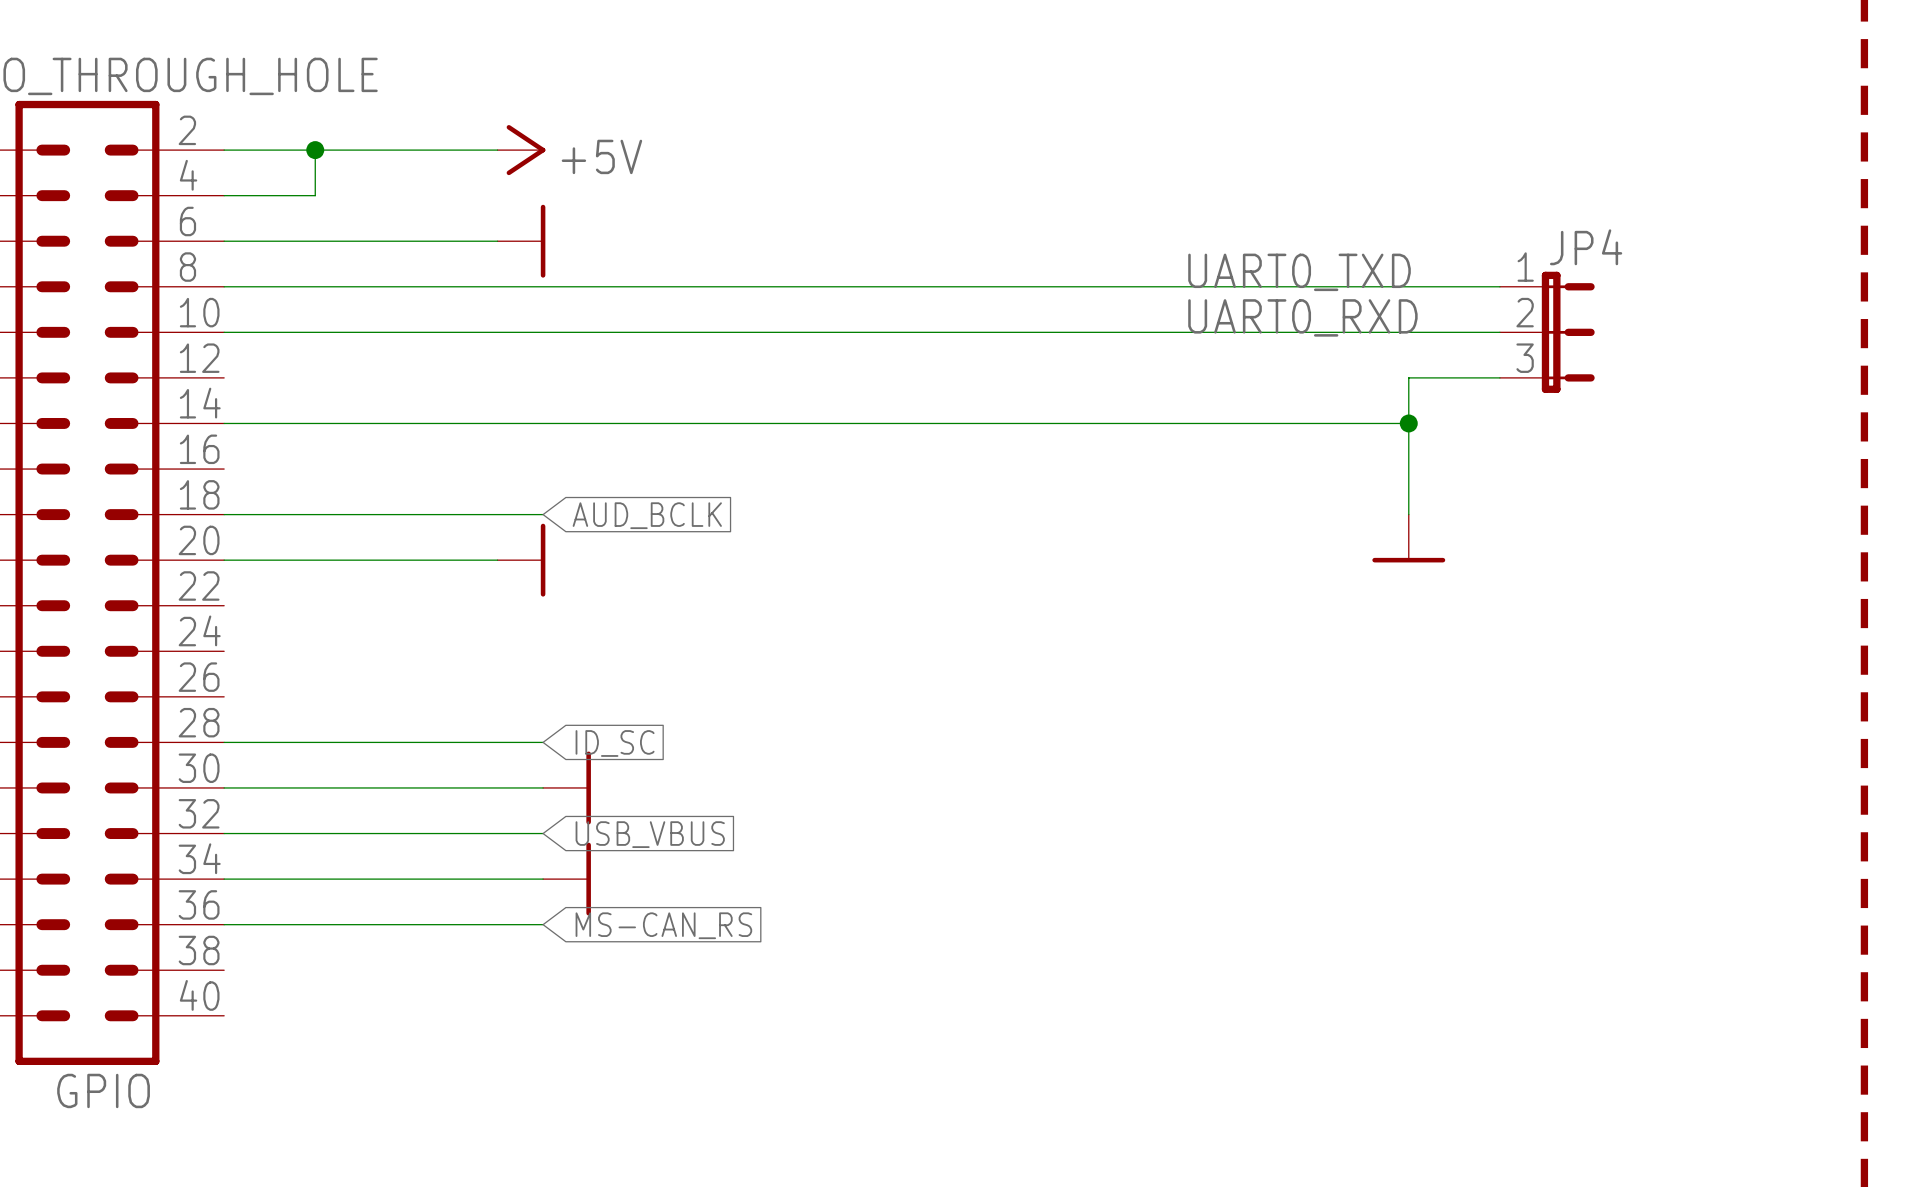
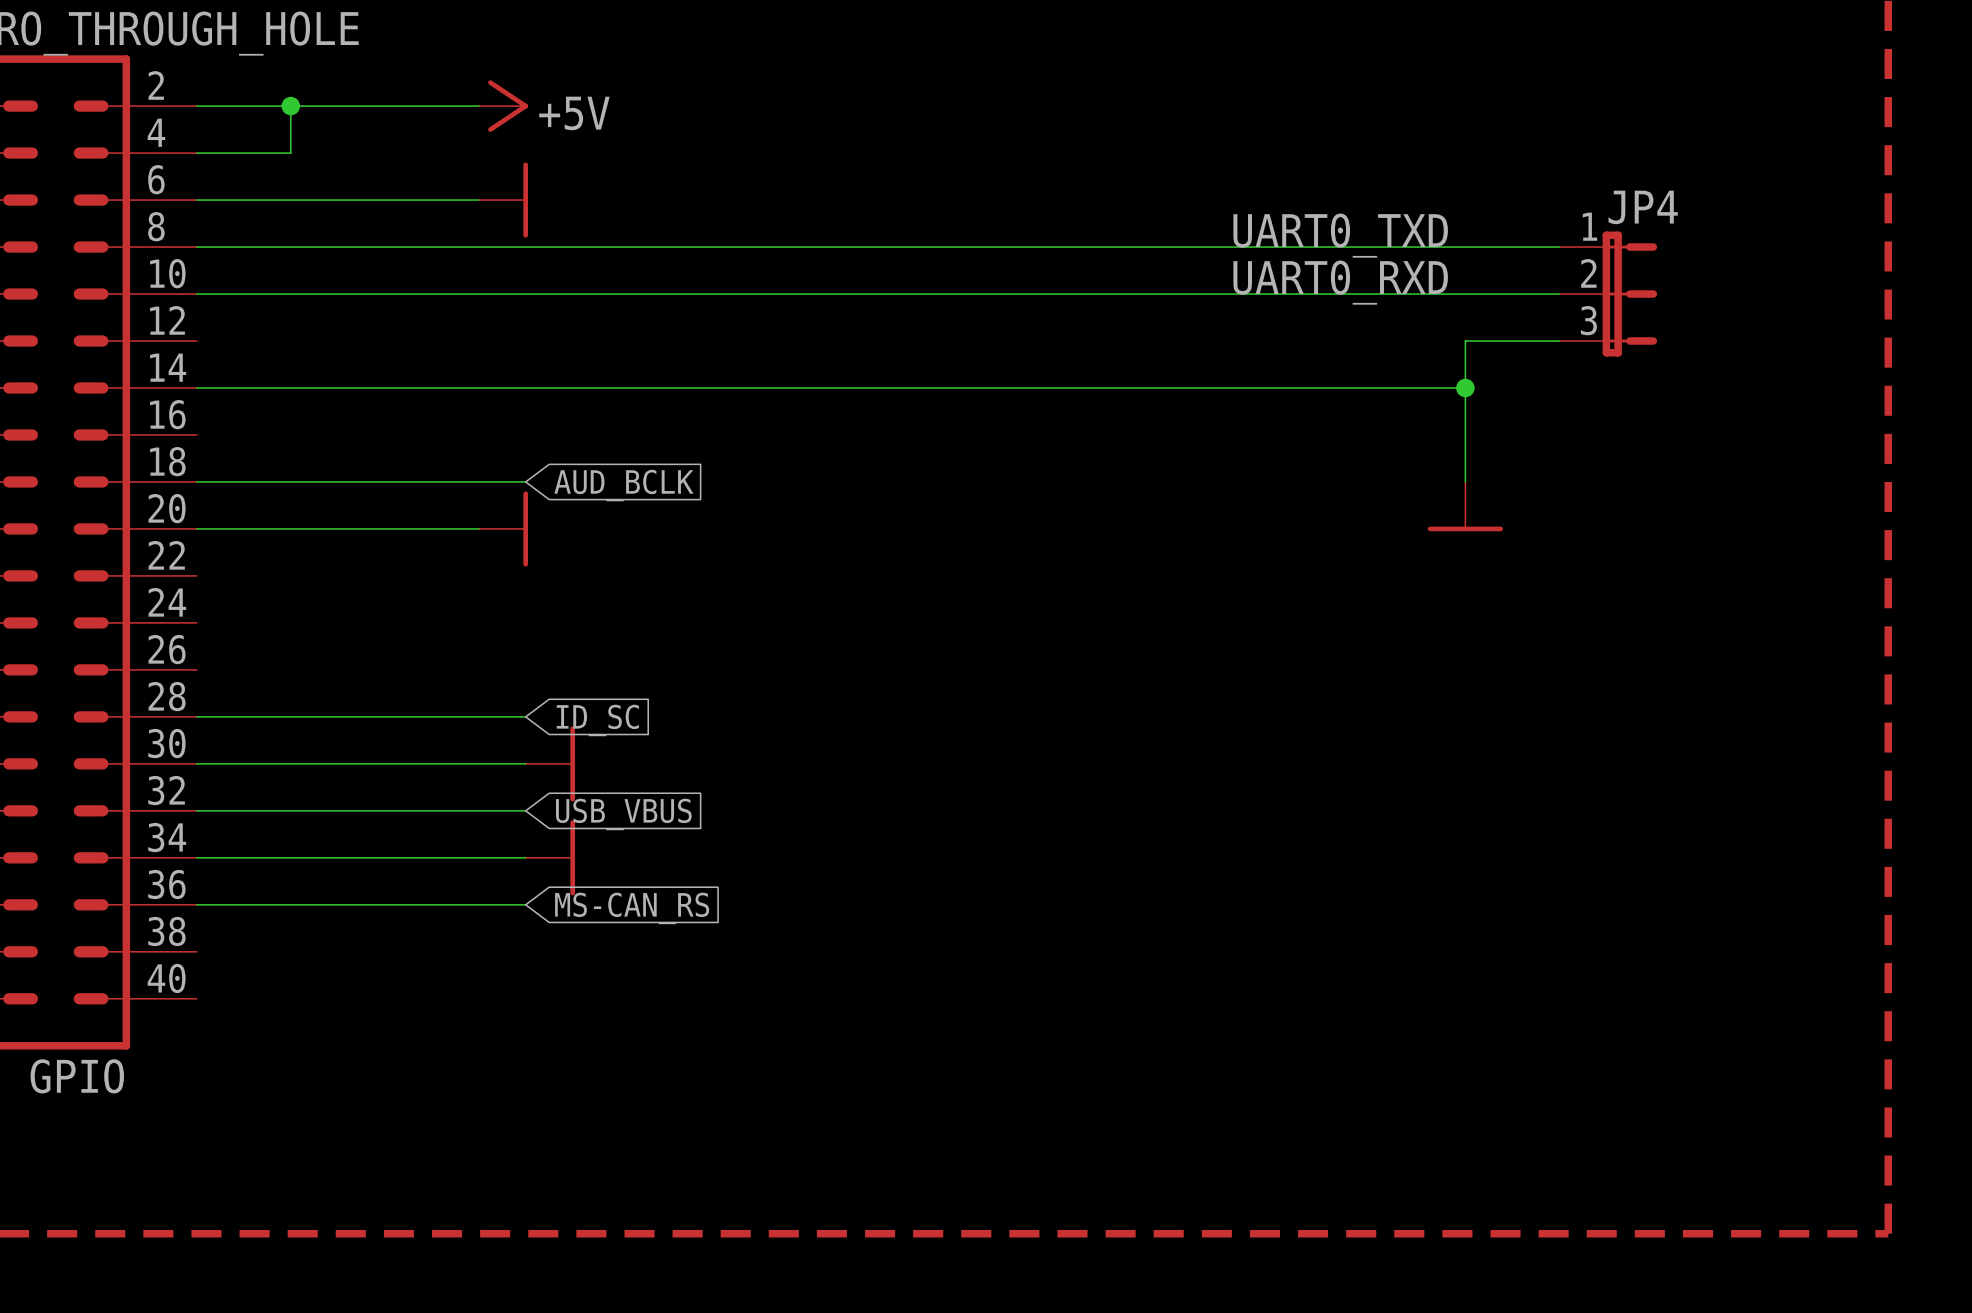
label position: UART0_TXD (1299, 272) -> UART0_TXD (1340, 235)
label position: UART0_RXD (1302, 317) -> UART0_RXD (1340, 282)
JP4 position: (1547, 332) -> (1608, 294)
wire: (1454, 377) (1408, 377) (1408, 514) -> (1465, 341) (1465, 481)
wire: none -> (1418, 387) (1465, 387)
junction position: (1408, 423) -> (1465, 387)
power symbol position: (1408, 538) -> (1465, 506)

